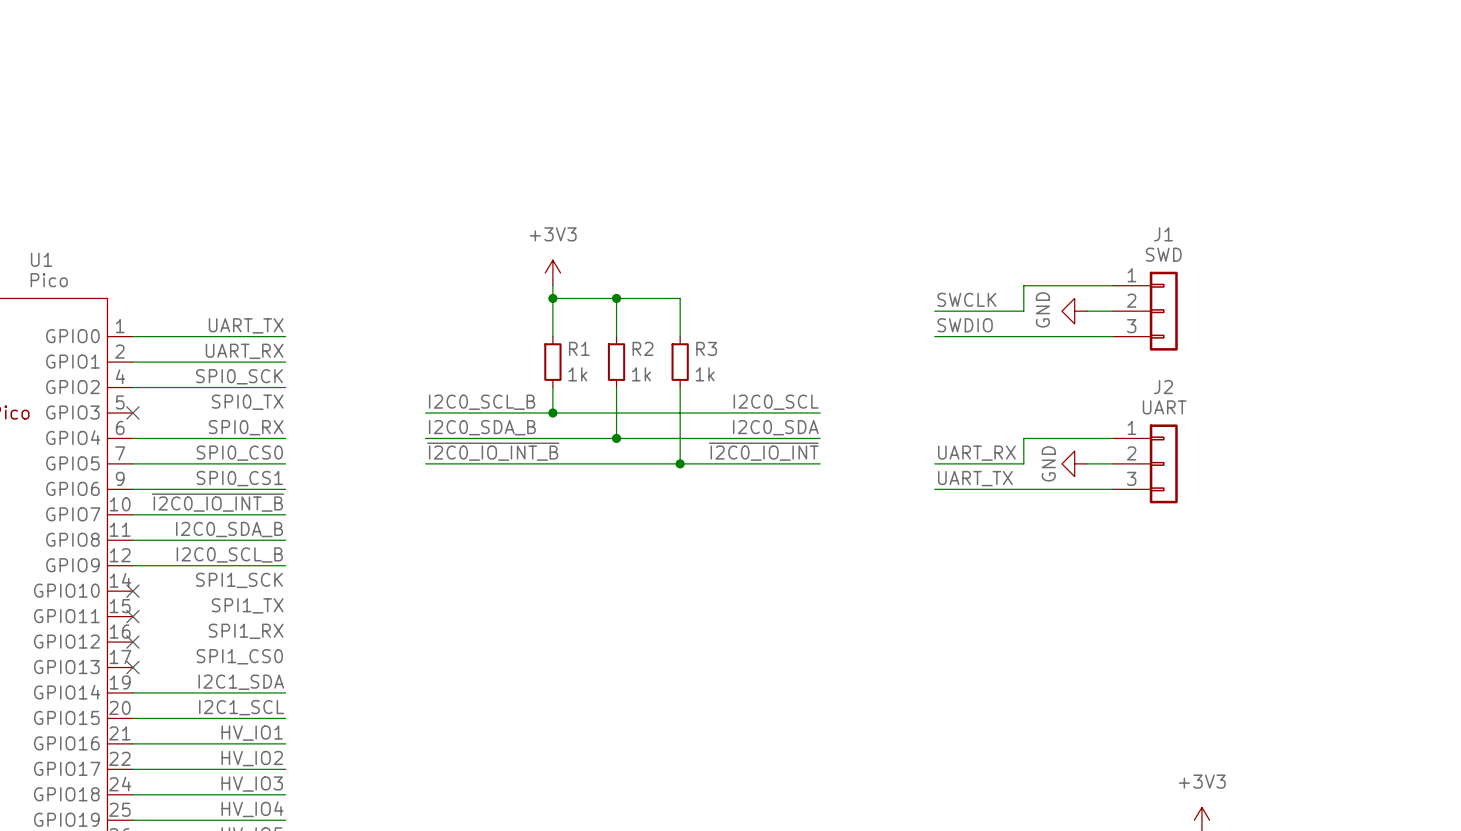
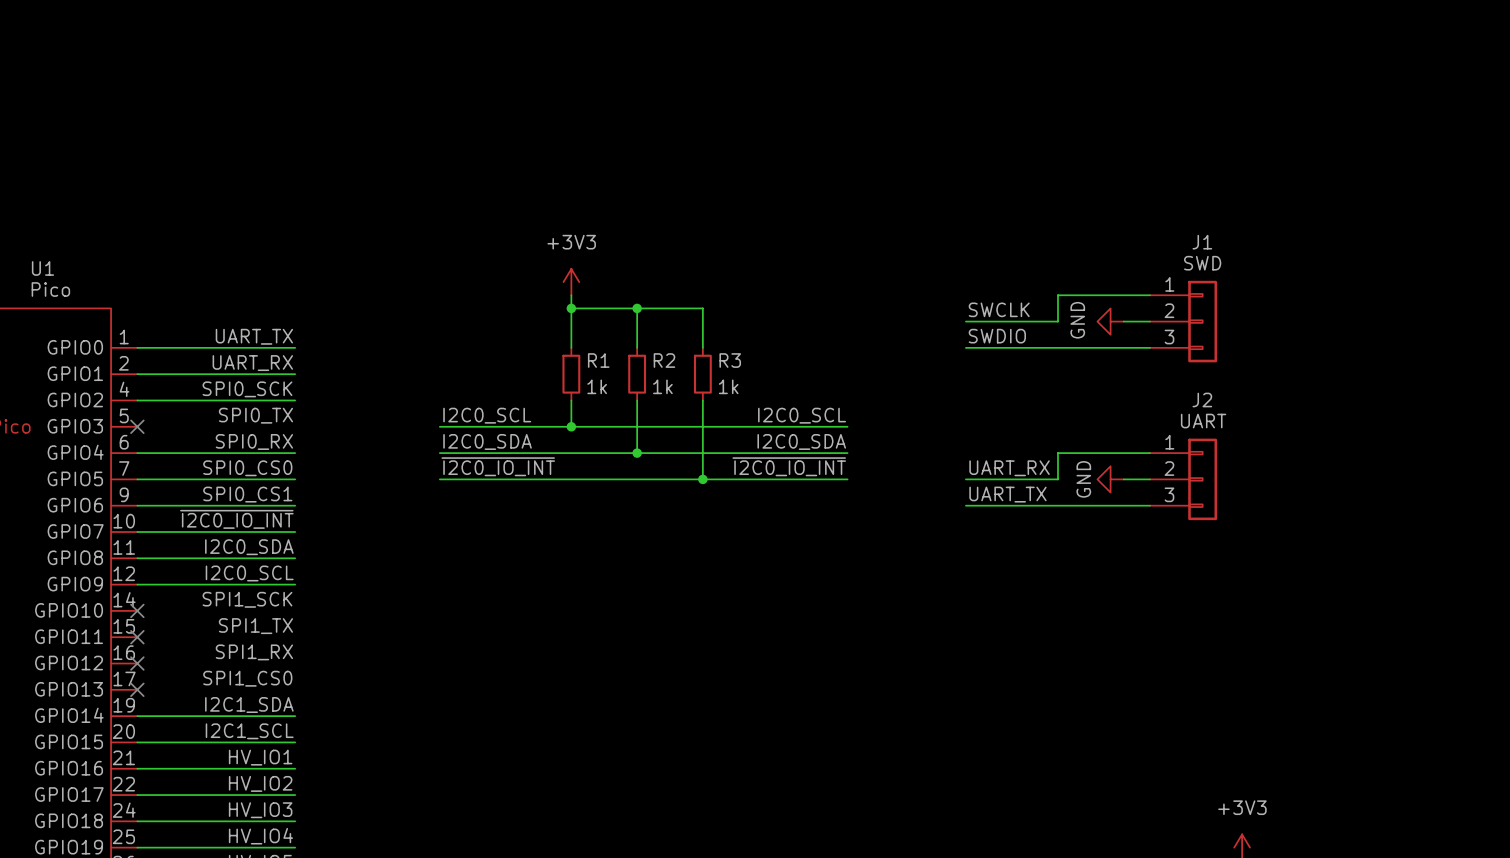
label: I2C0_SCL_B (482, 402) -> I2C0_SCL (487, 415)
label: I2C0_SDA_B (482, 427) -> I2C0_SDA (487, 441)
label: ~{I2C0_IO_INT_B} (493, 451) -> ~{I2C0_IO_INT} (498, 466)
label: ~{I2C0_IO_INT_B} (217, 502) -> ~{I2C0_IO_INT} (236, 519)
label: I2C0_SDA_B (229, 529) -> I2C0_SDA (249, 547)
label: I2C0_SCL_B (229, 554) -> I2C0_SCL (249, 573)

